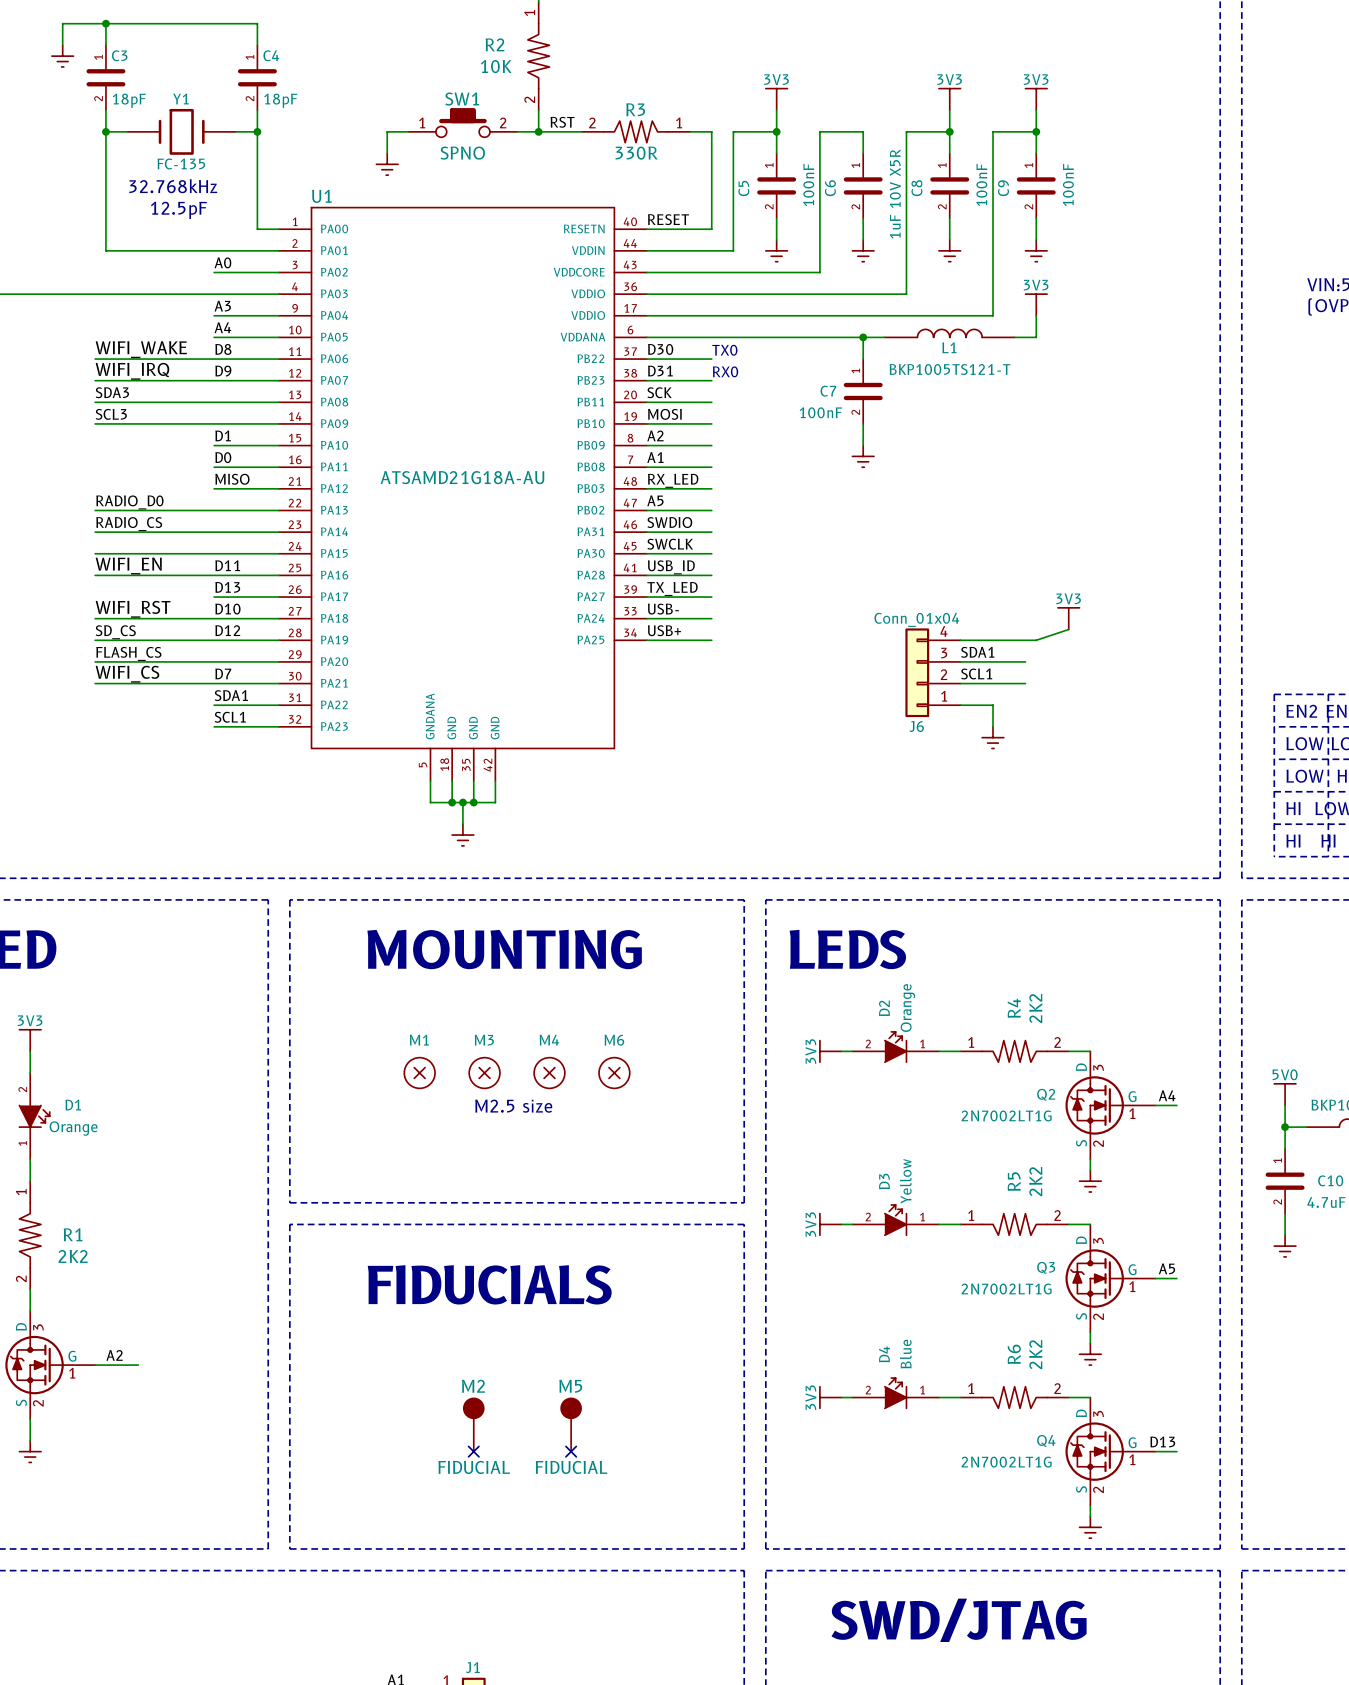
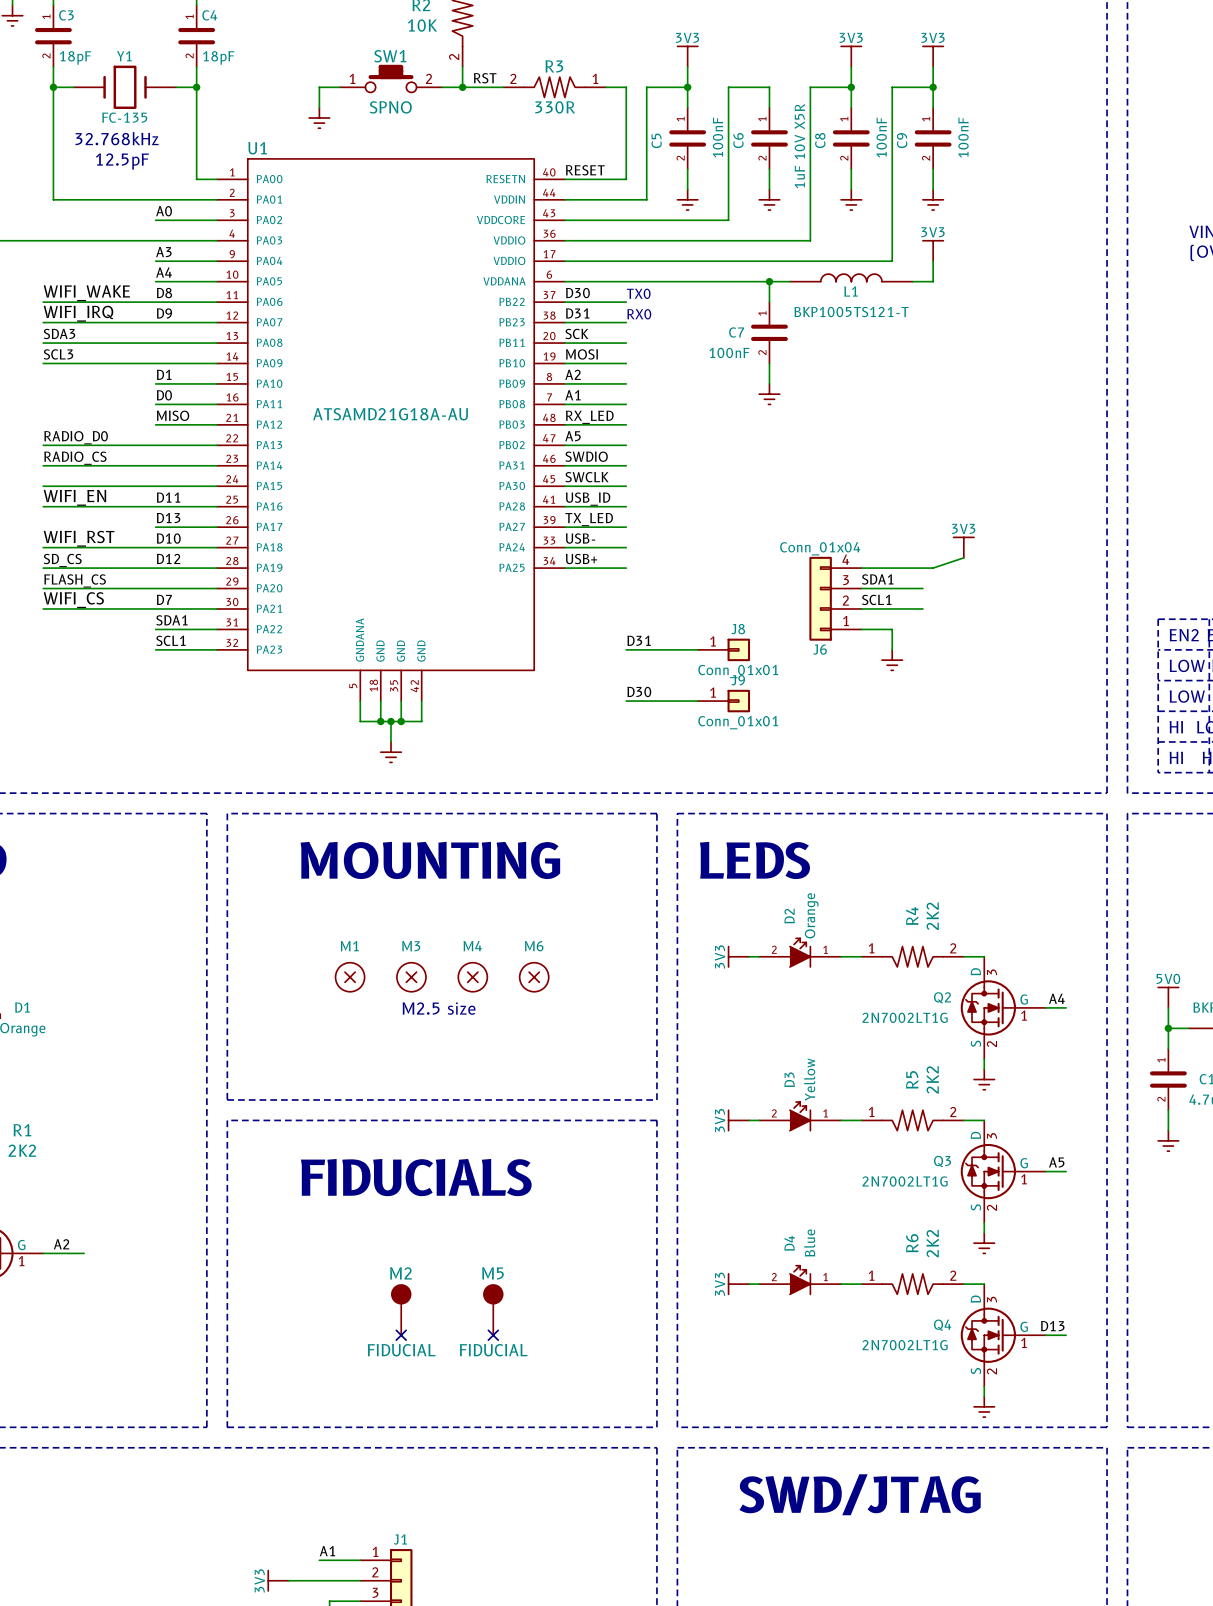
label: none -> D31 (639, 640)
wire: none -> (626, 649) (697, 649)
J8: none -> Conn_01x01 (723, 649)
label: none -> D30 (639, 691)
wire: none -> (626, 701) (697, 701)
J9: none -> Conn_01x01 (723, 701)

